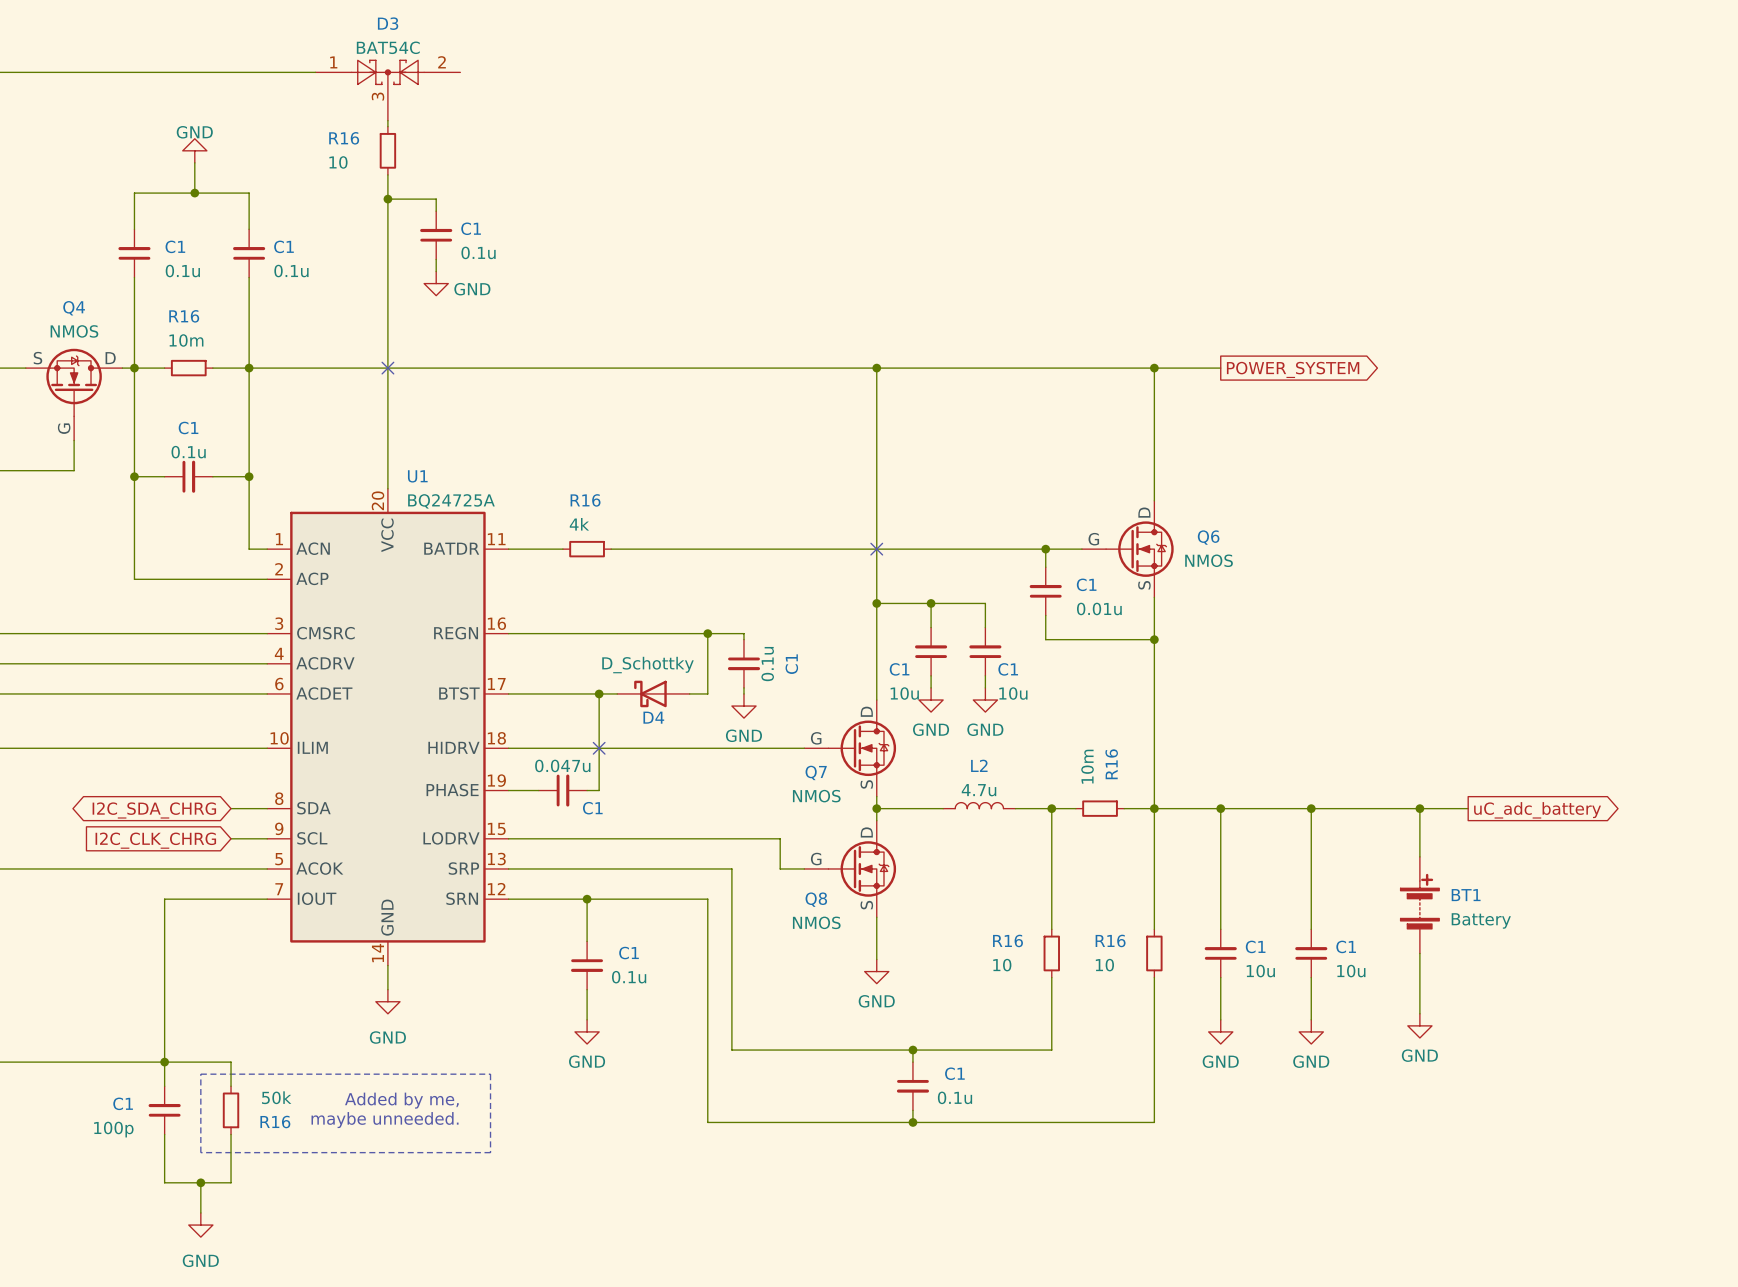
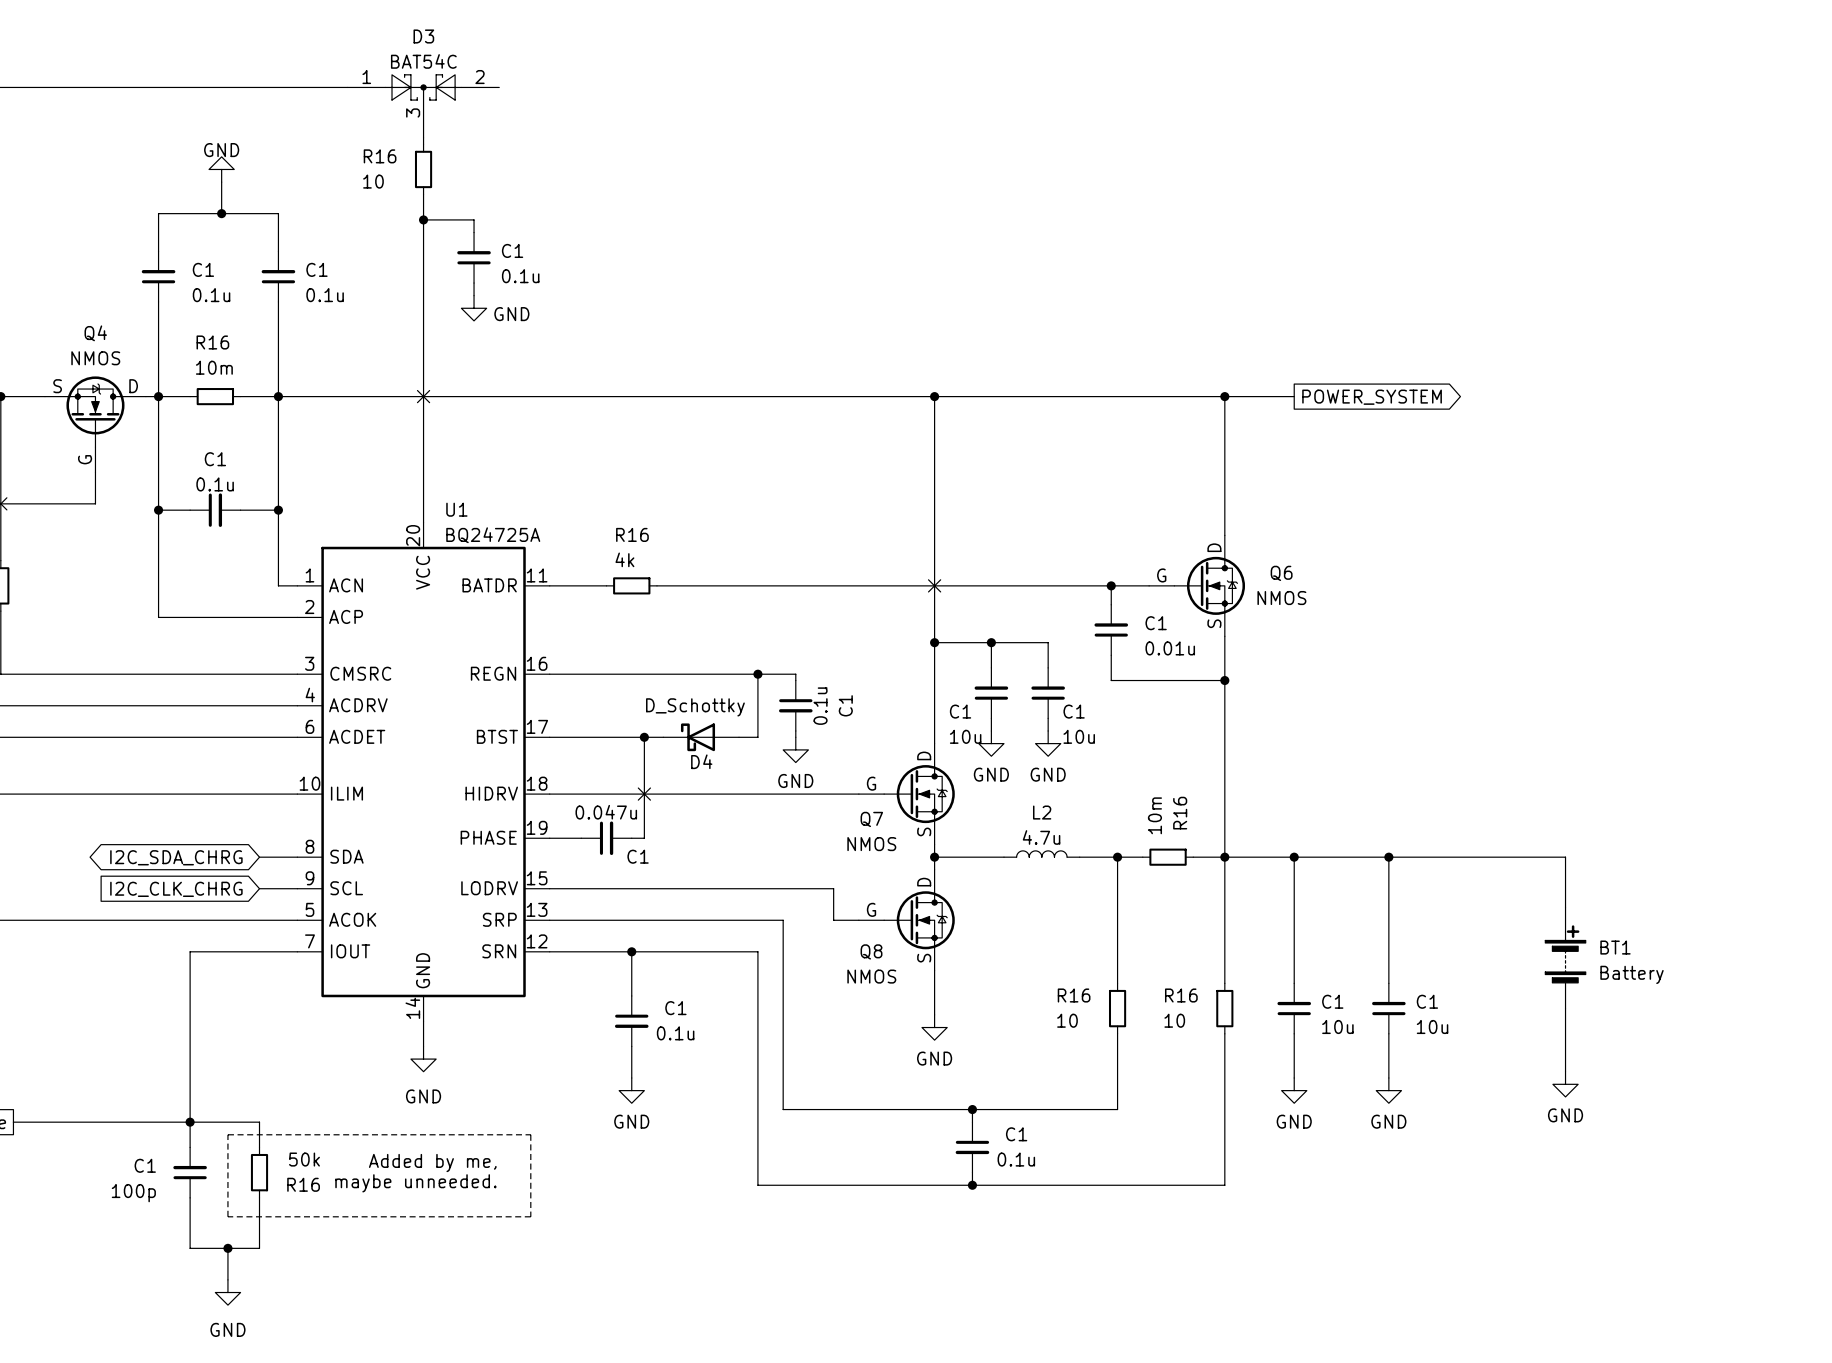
wire: (1419, 808) (1419, 856) -> none
junction: (1419, 808) -> none
wire: none -> (1552, 857) (1565, 857) (1565, 907)
global label: uC_adc_battery (1537, 810) -> none
BT1 position: (1419, 905) -> (1565, 958)
wire: (1419, 953) (1419, 1013) -> (1565, 1008) (1565, 1071)
power symbol position: GND (1419, 1025) -> GND (1565, 1084)

